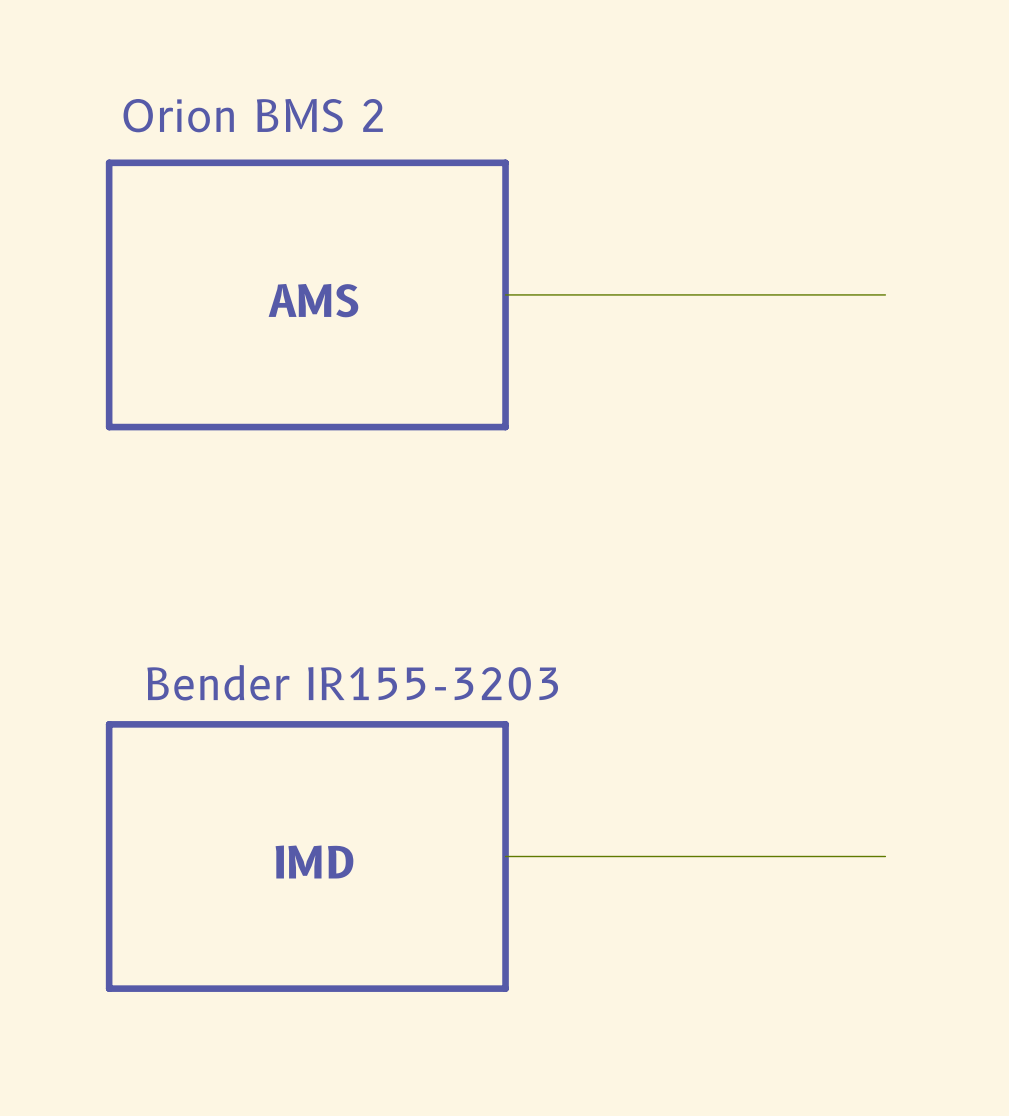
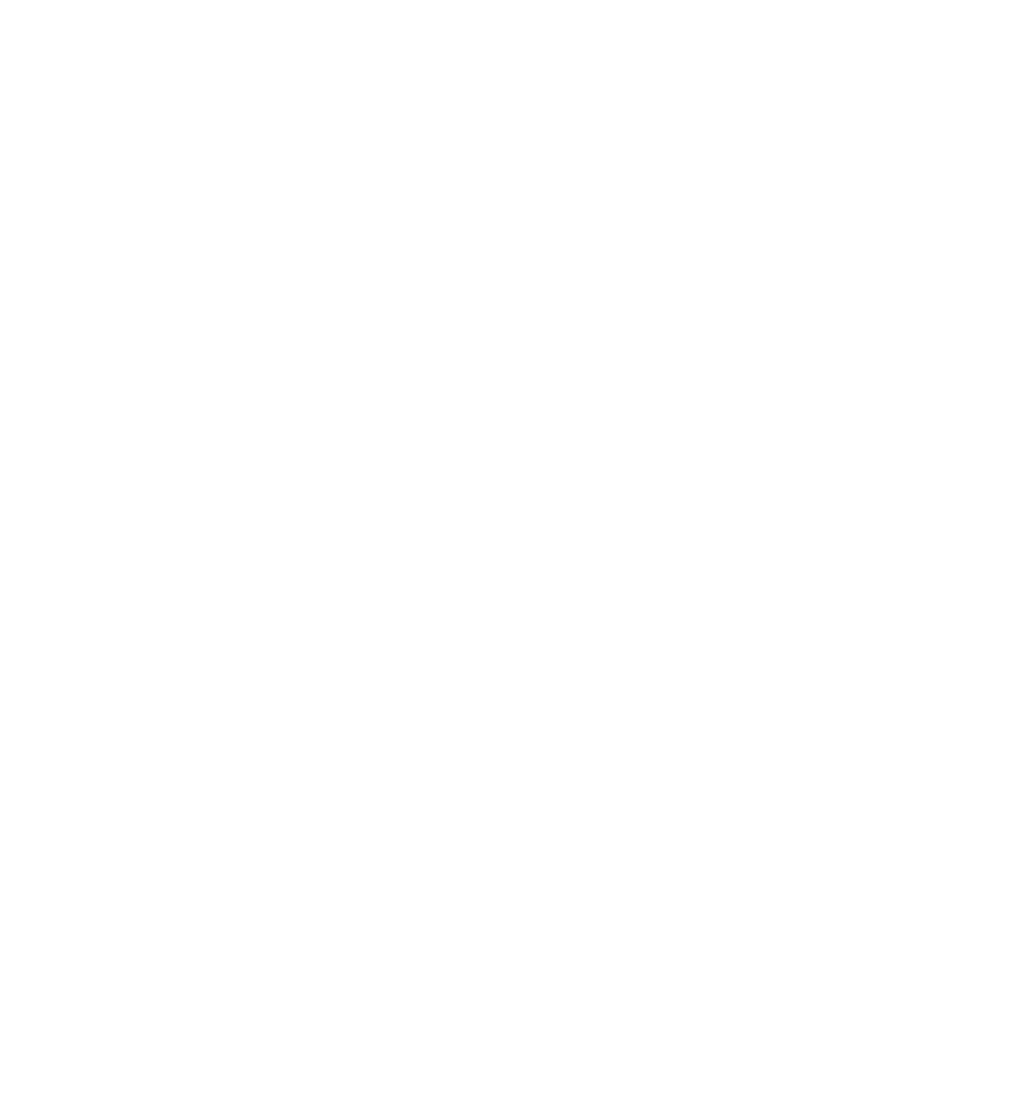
text: Orion BMS 2 (253, 115) -> none
line: (109, 162) (109, 427) (505, 427) (505, 162) (109, 162) -> none
wire: (505, 294) (885, 294) -> none
text: AMS (313, 300) -> none
text: Bender IR155-3203 (352, 682) -> none
line: (109, 724) (505, 724) (505, 988) (109, 988) (109, 724) -> none
wire: (505, 856) (885, 856) -> none
text: IMD (314, 861) -> none

